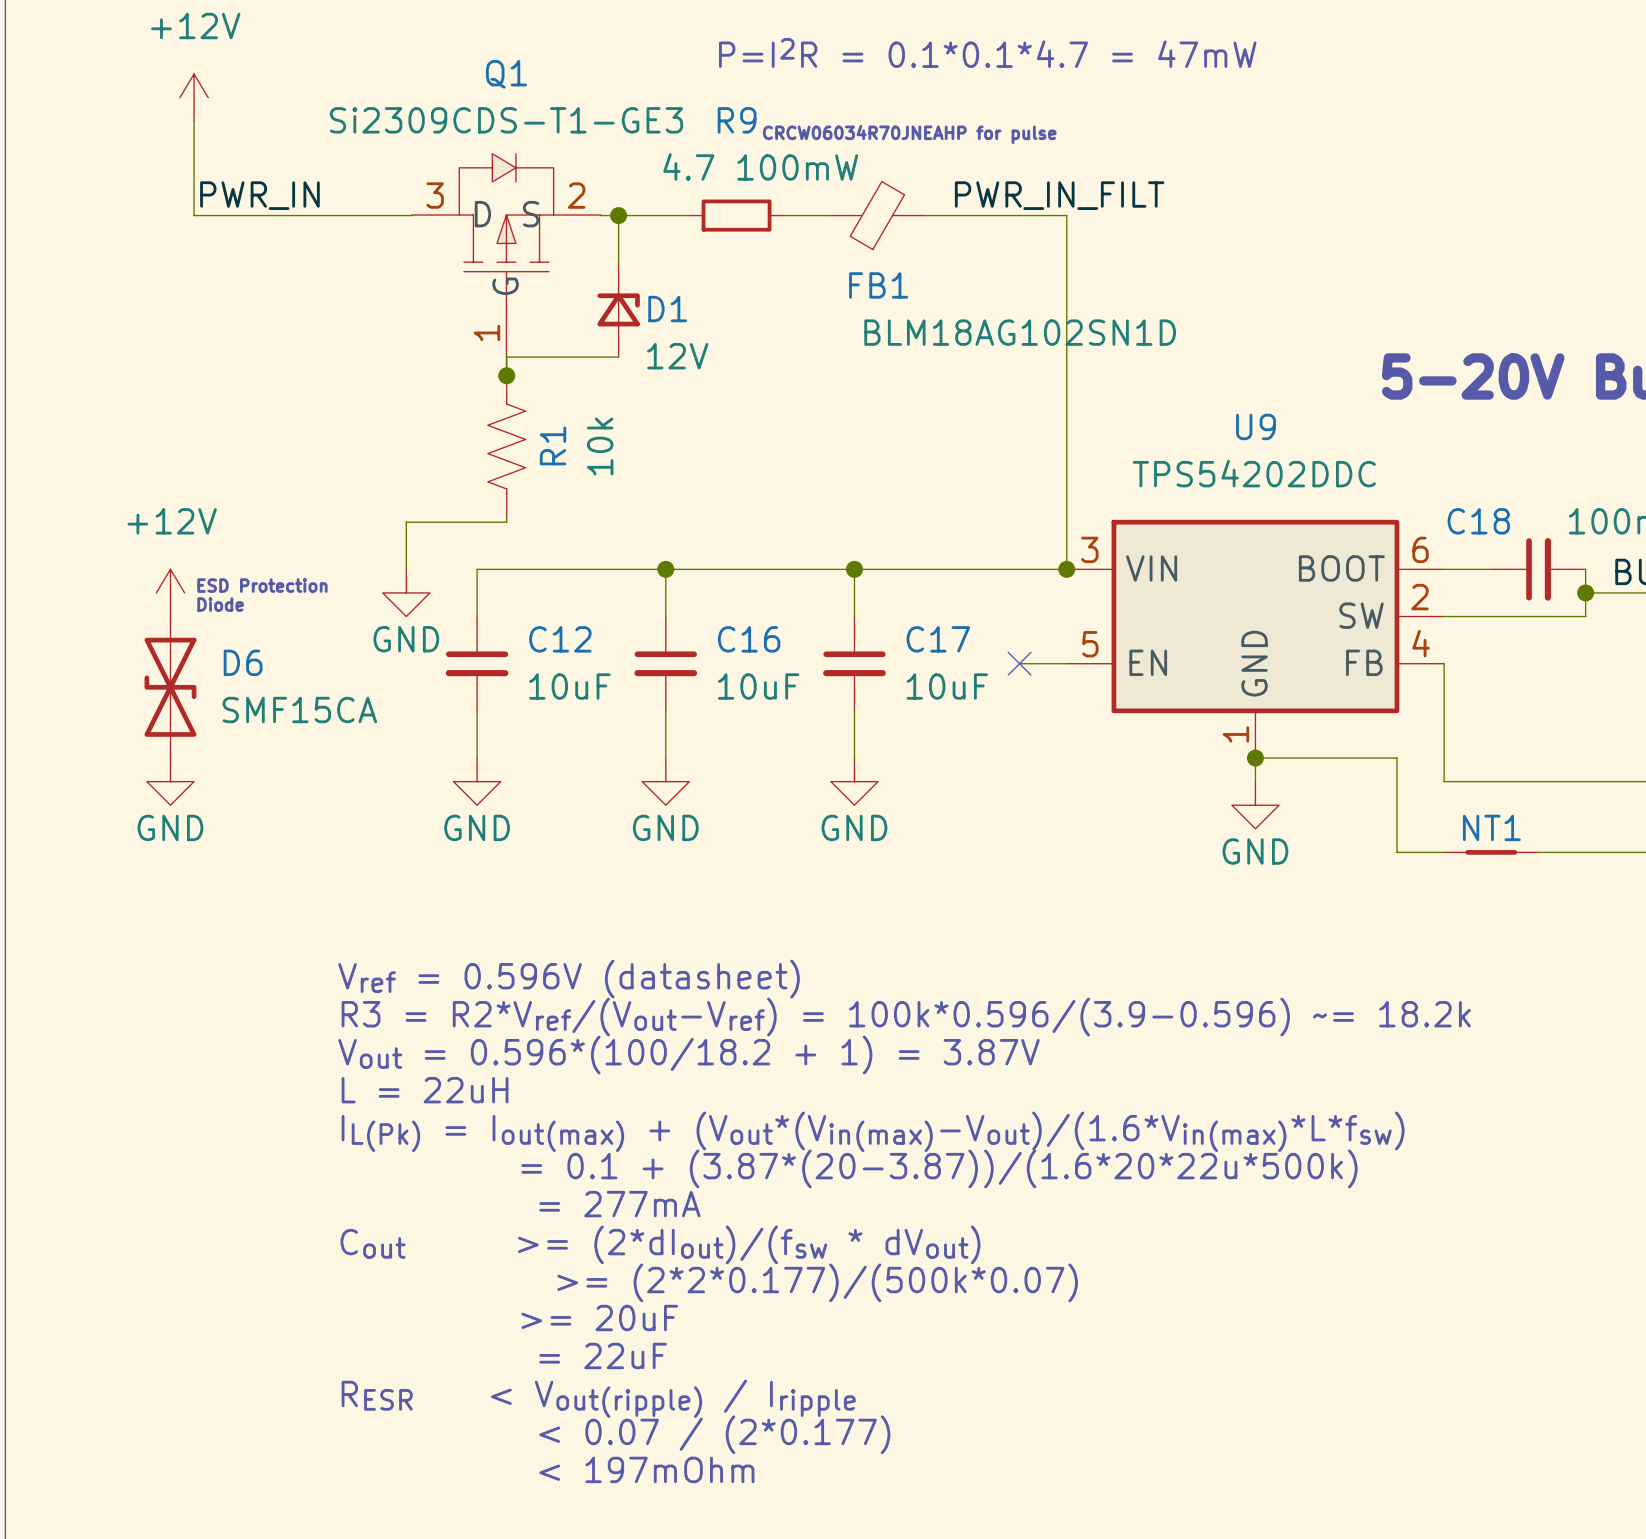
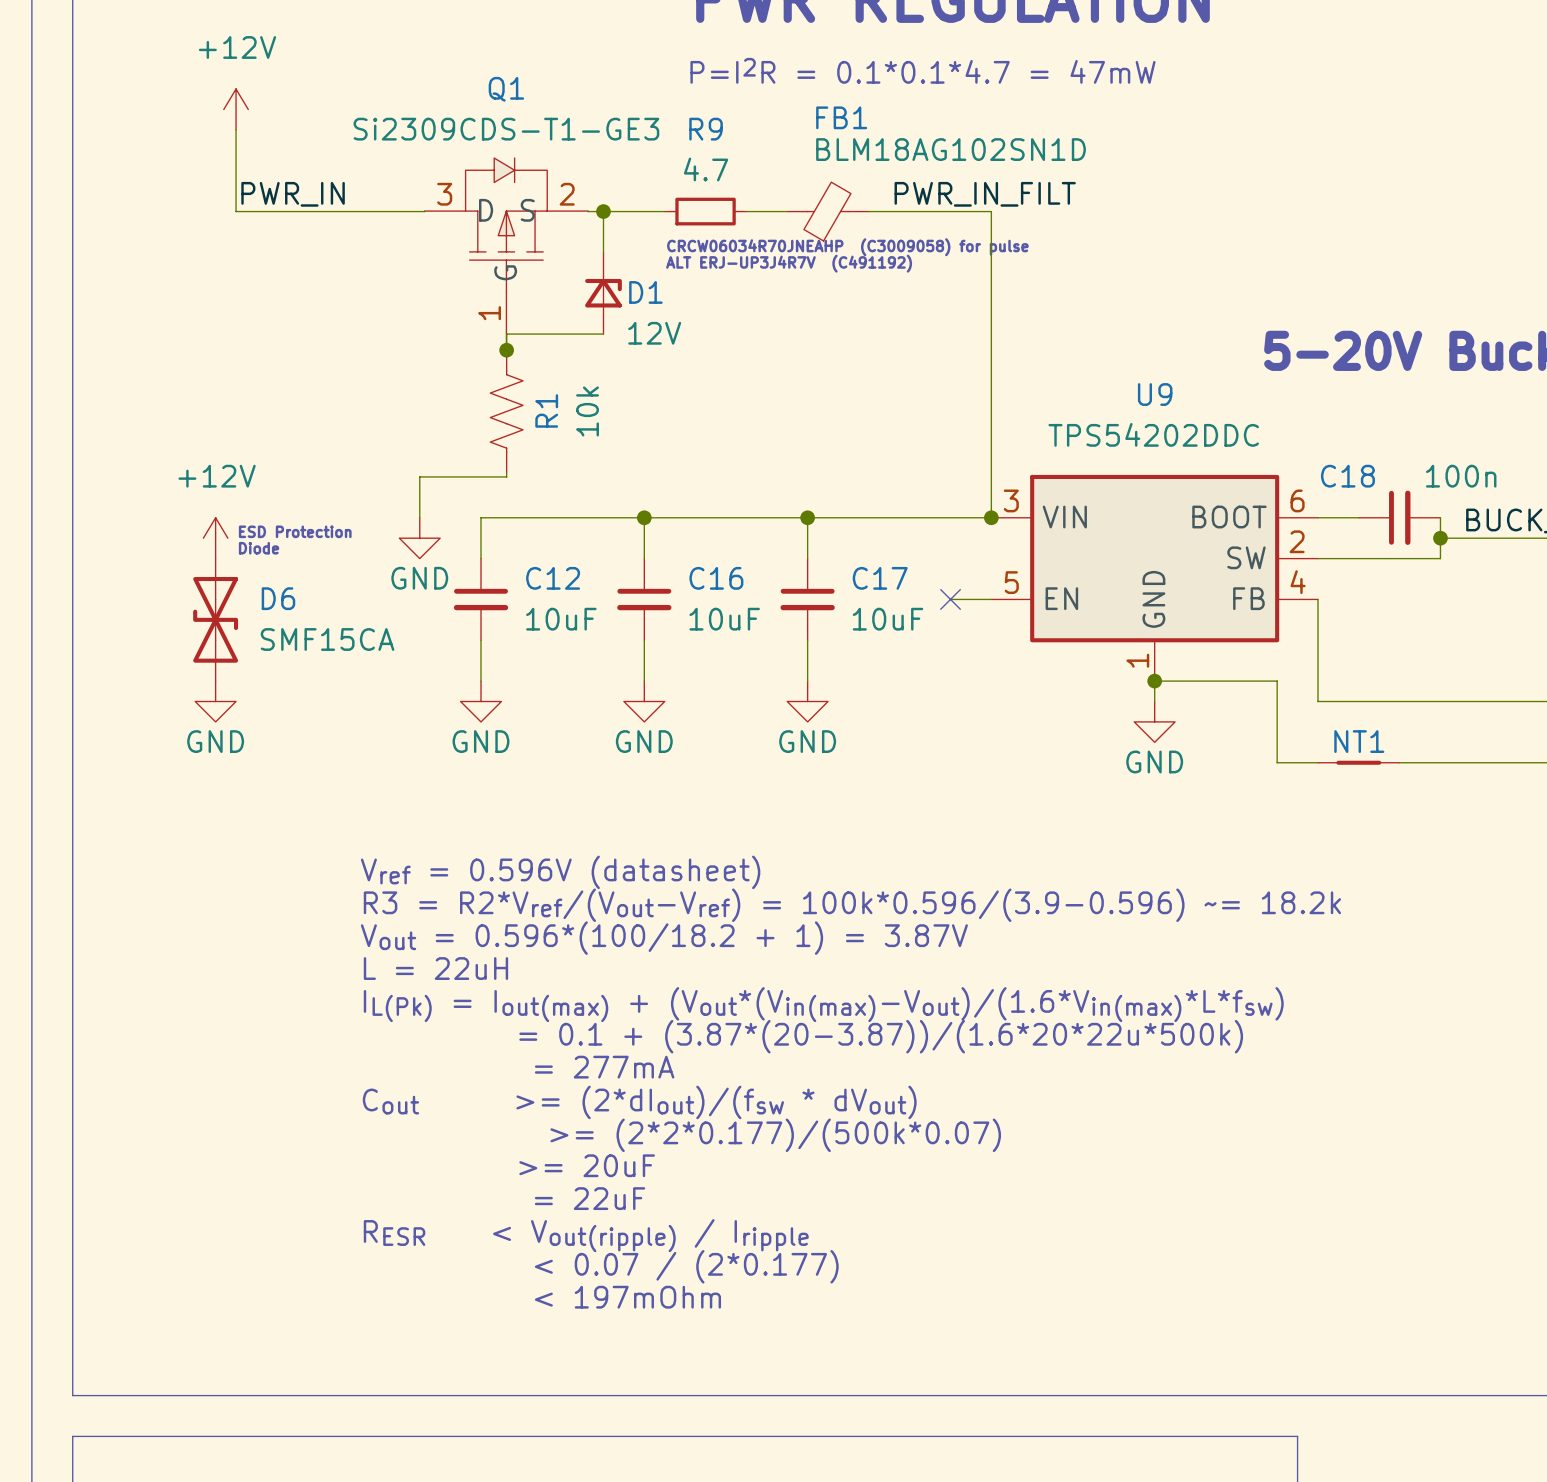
text: CRCW06034R70JNEAHP for pulse (909, 134) -> none
R9 value: 4.7 100mW (760, 166) -> 4.7 (706, 169)
text: none -> CRCW06034R70JNEAHP (C3009058) for pulse (847, 247)
text: none -> ALT ERJ-UP3J4R7V (C491192) (789, 263)
FB1 name position: FB1 (878, 285) -> FB1 (841, 117)
FB1 value position: BLM18AG102SN1D (1020, 332) -> BLM18AG102SN1D (951, 149)

